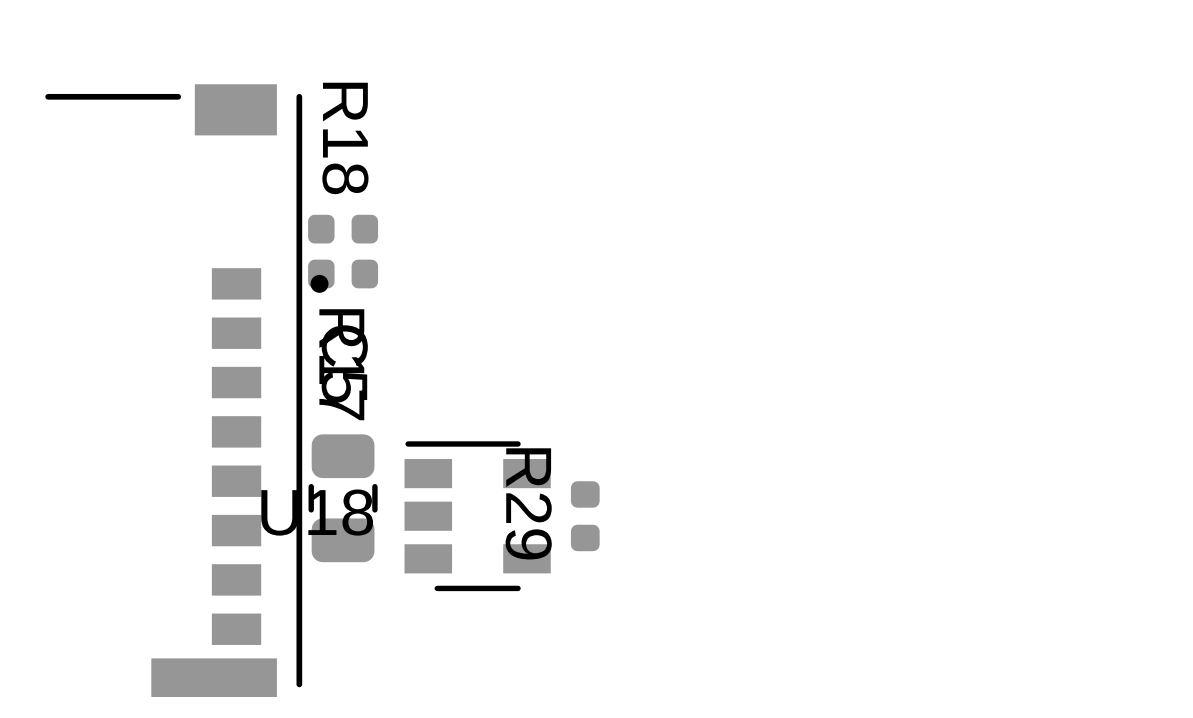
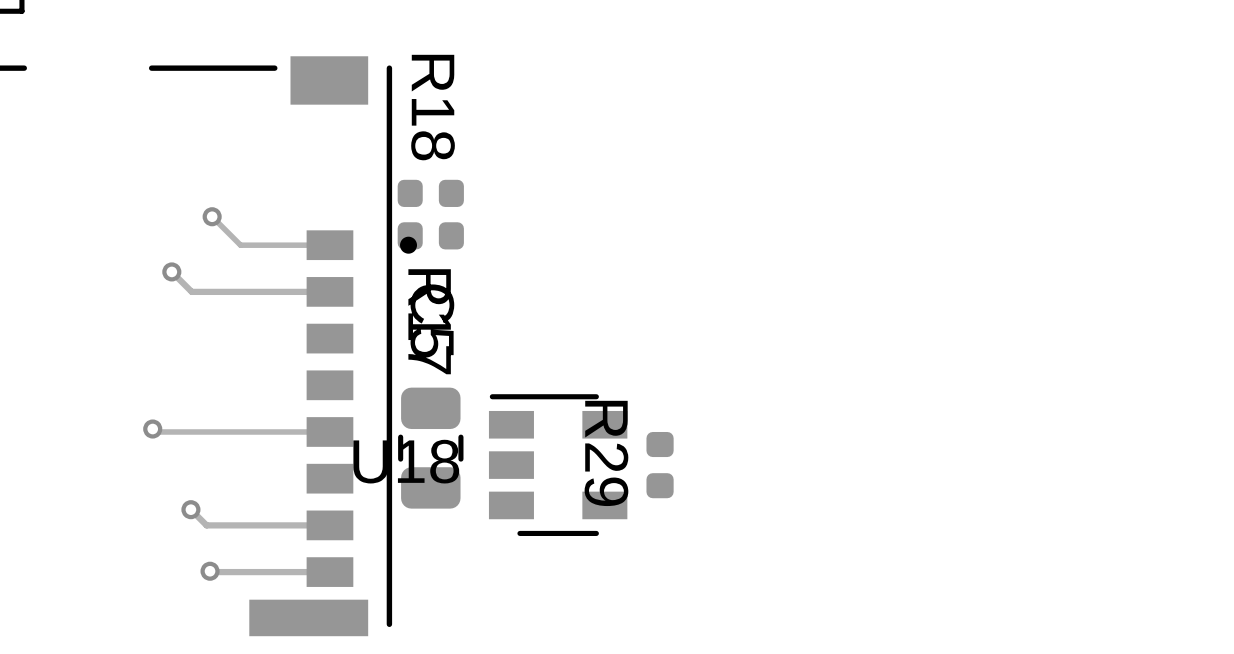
track: none -> (212, 216) (240, 245) (329, 245)
via: none -> (212, 216)
track: none -> (171, 271) (191, 291) (329, 291)
via: none -> (171, 271)
via: none -> (152, 429)
track: none -> (329, 431) (155, 431)
track: none -> (190, 509) (206, 525) (329, 525)
via: none -> (190, 509)
track: none -> (210, 571) (329, 572)
via: none -> (210, 571)

